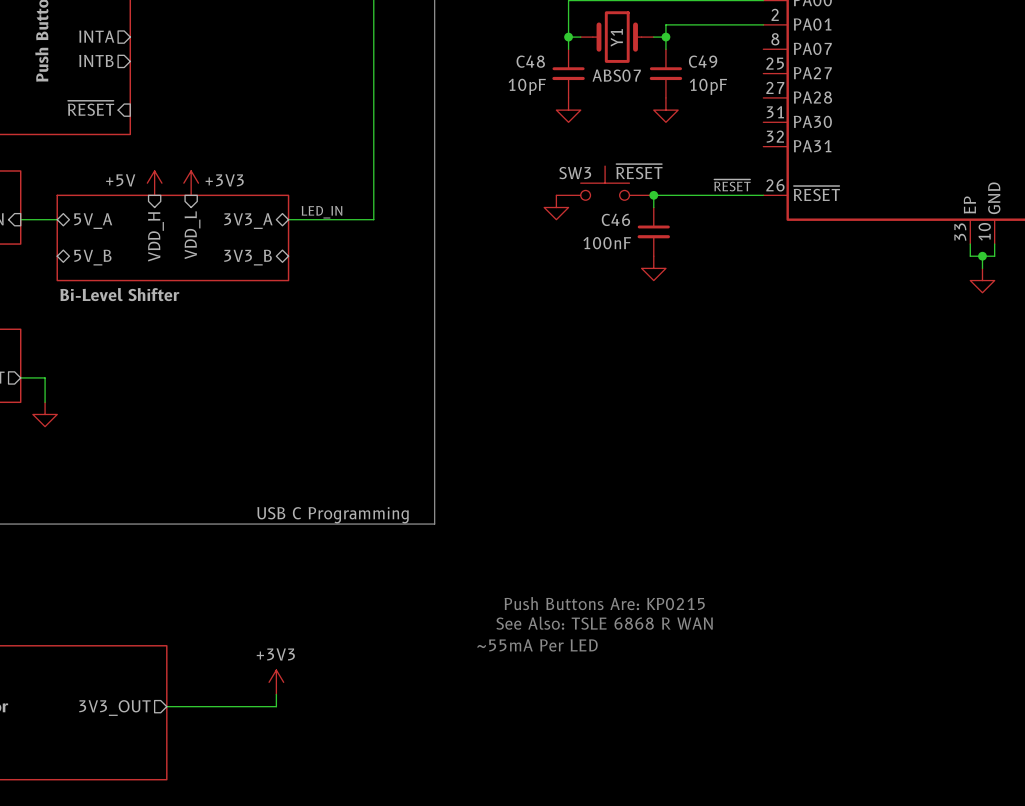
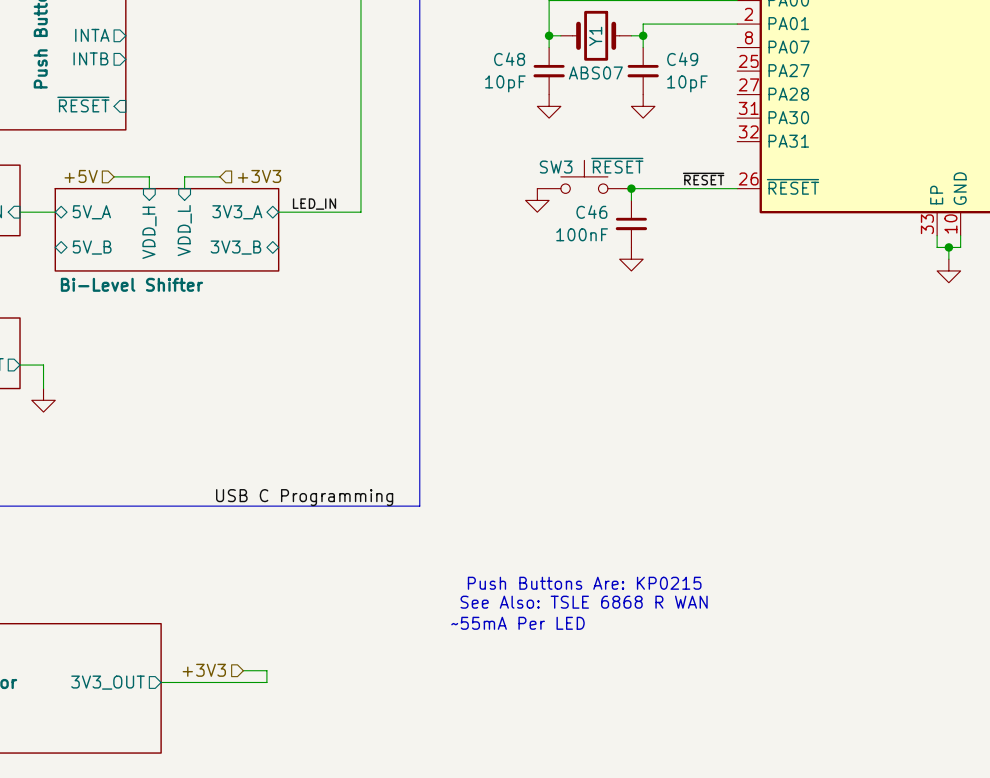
hierarchical label: none -> +5V (81, 176)
hierarchical label: none -> +3V3 (259, 176)
wire: none -> (114, 176) (149, 176) (149, 188)
power symbol: +5V (154, 183) -> none
power symbol: +3V3 (191, 183) -> none
wire: none -> (219, 176) (184, 176) (184, 188)
power symbol: +3V3 (276, 682) -> none
hierarchical label: none -> +3V3 (204, 670)
wire: none -> (243, 670) (266, 670)

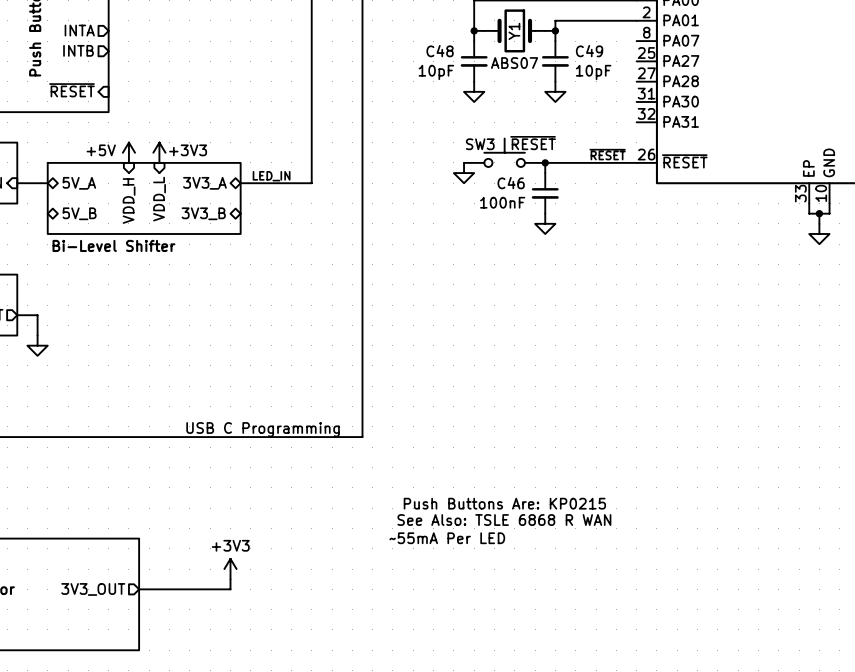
hierarchical label: +5V (81, 176) -> none
wire: (114, 176) (149, 176) (149, 188) -> none
power symbol: none -> +5V (128, 152)
power symbol: none -> +3V3 (159, 152)
wire: (219, 176) (184, 176) (184, 188) -> none
hierarchical label: +3V3 (259, 176) -> none
power symbol: none -> +3V3 (230, 569)
hierarchical label: +3V3 (204, 670) -> none
wire: (243, 670) (266, 670) -> none

